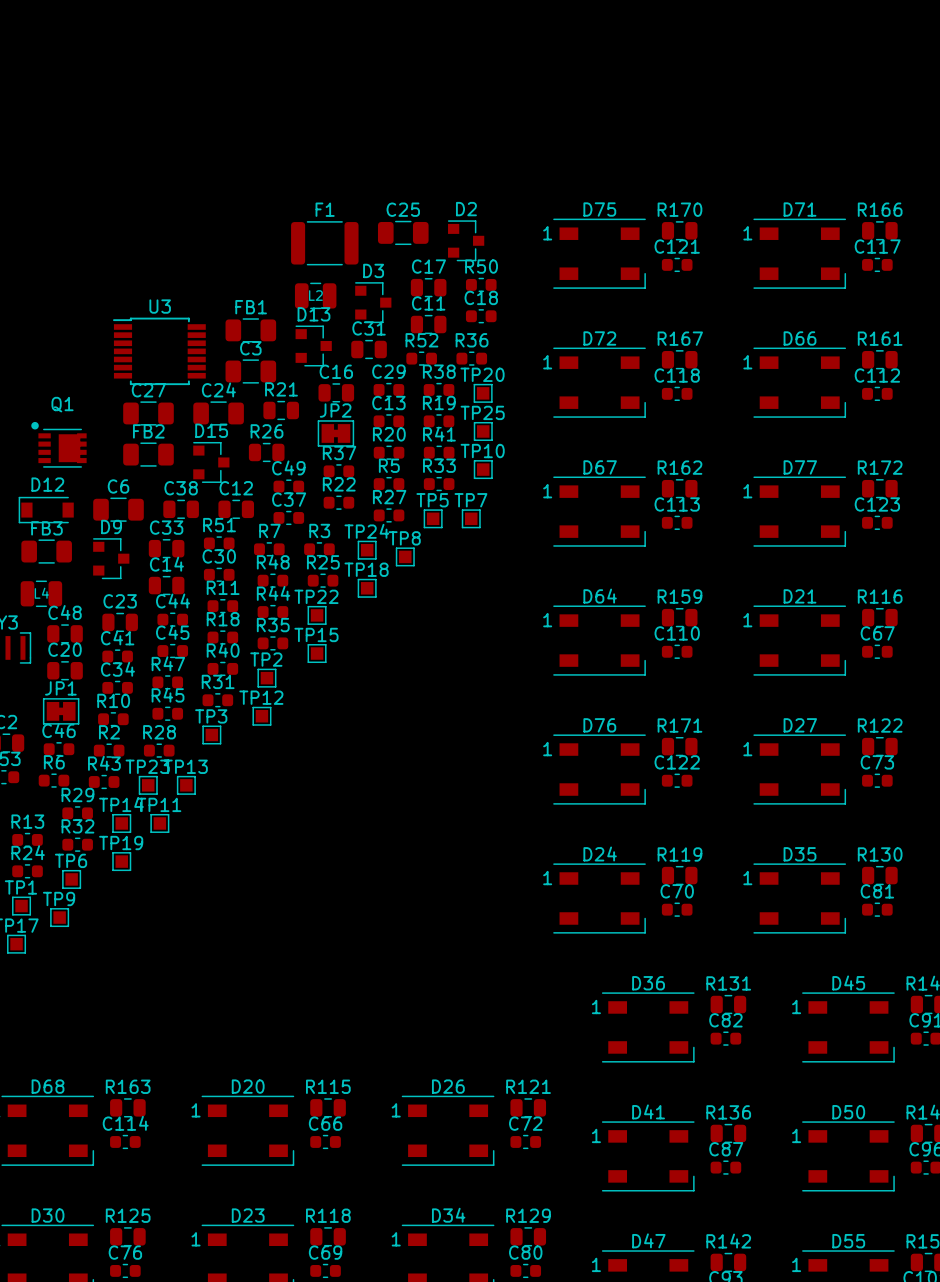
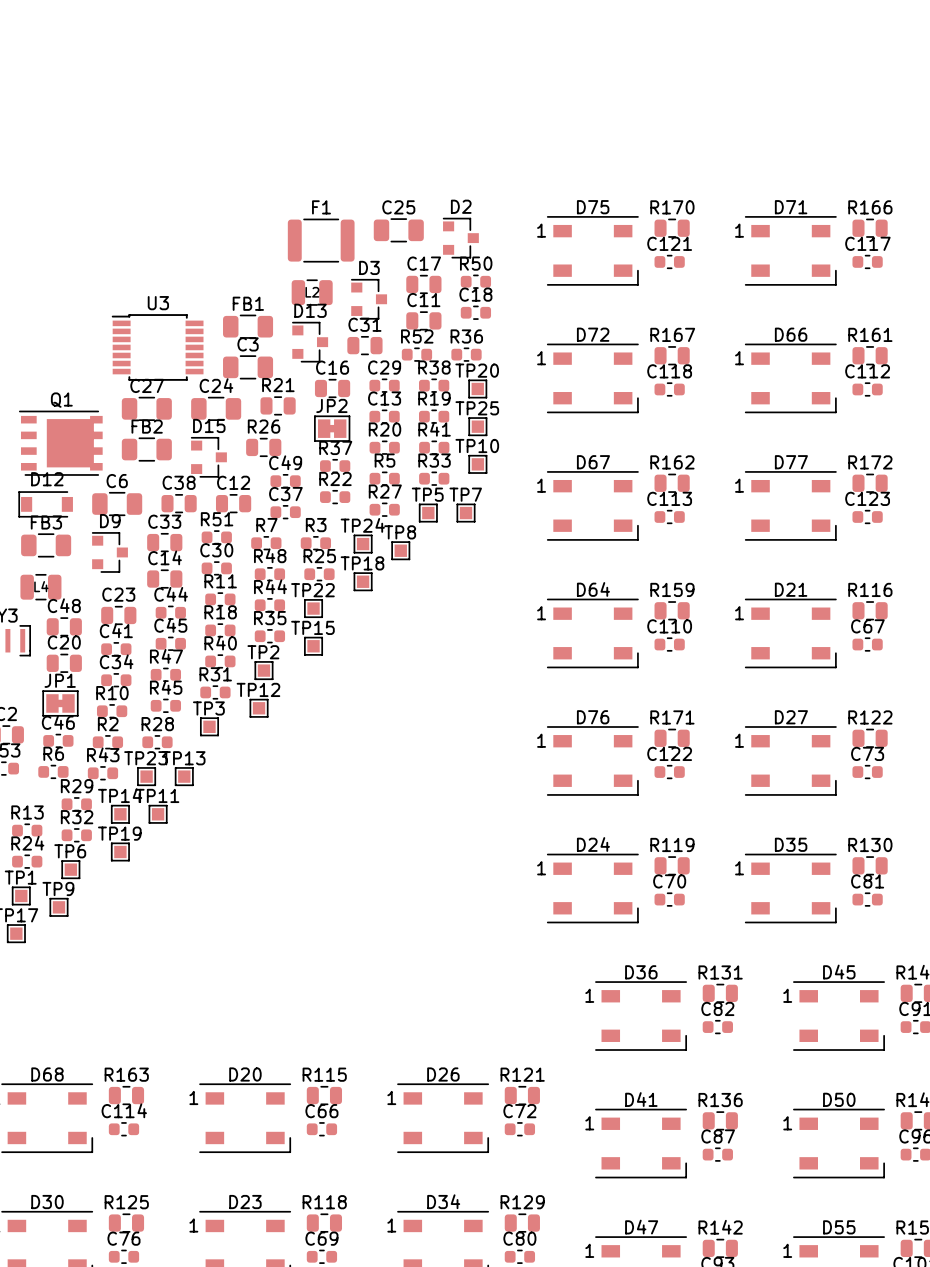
Q1 footprint: [31, 421, 87, 468] -> [19, 410, 103, 476]

